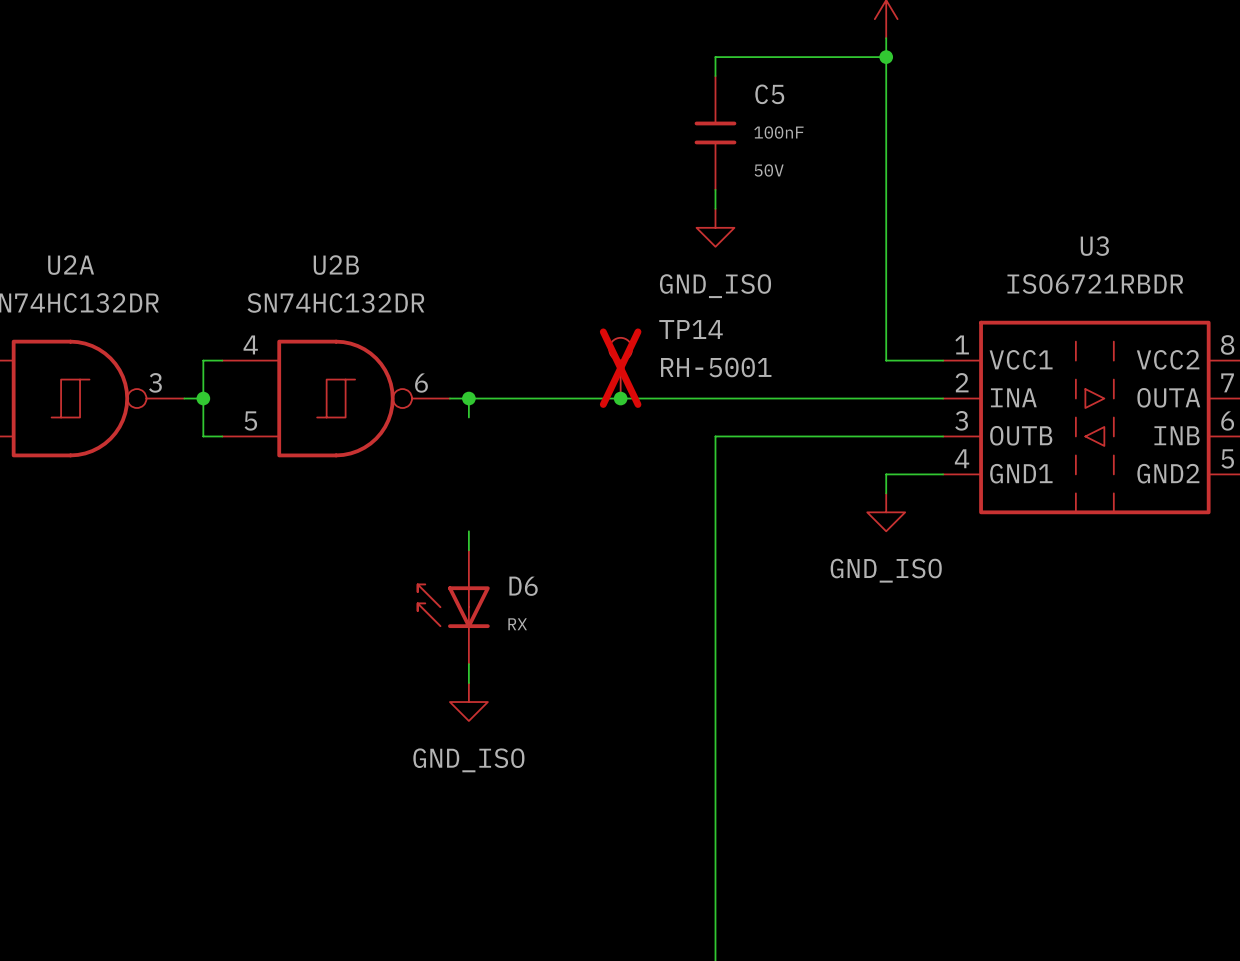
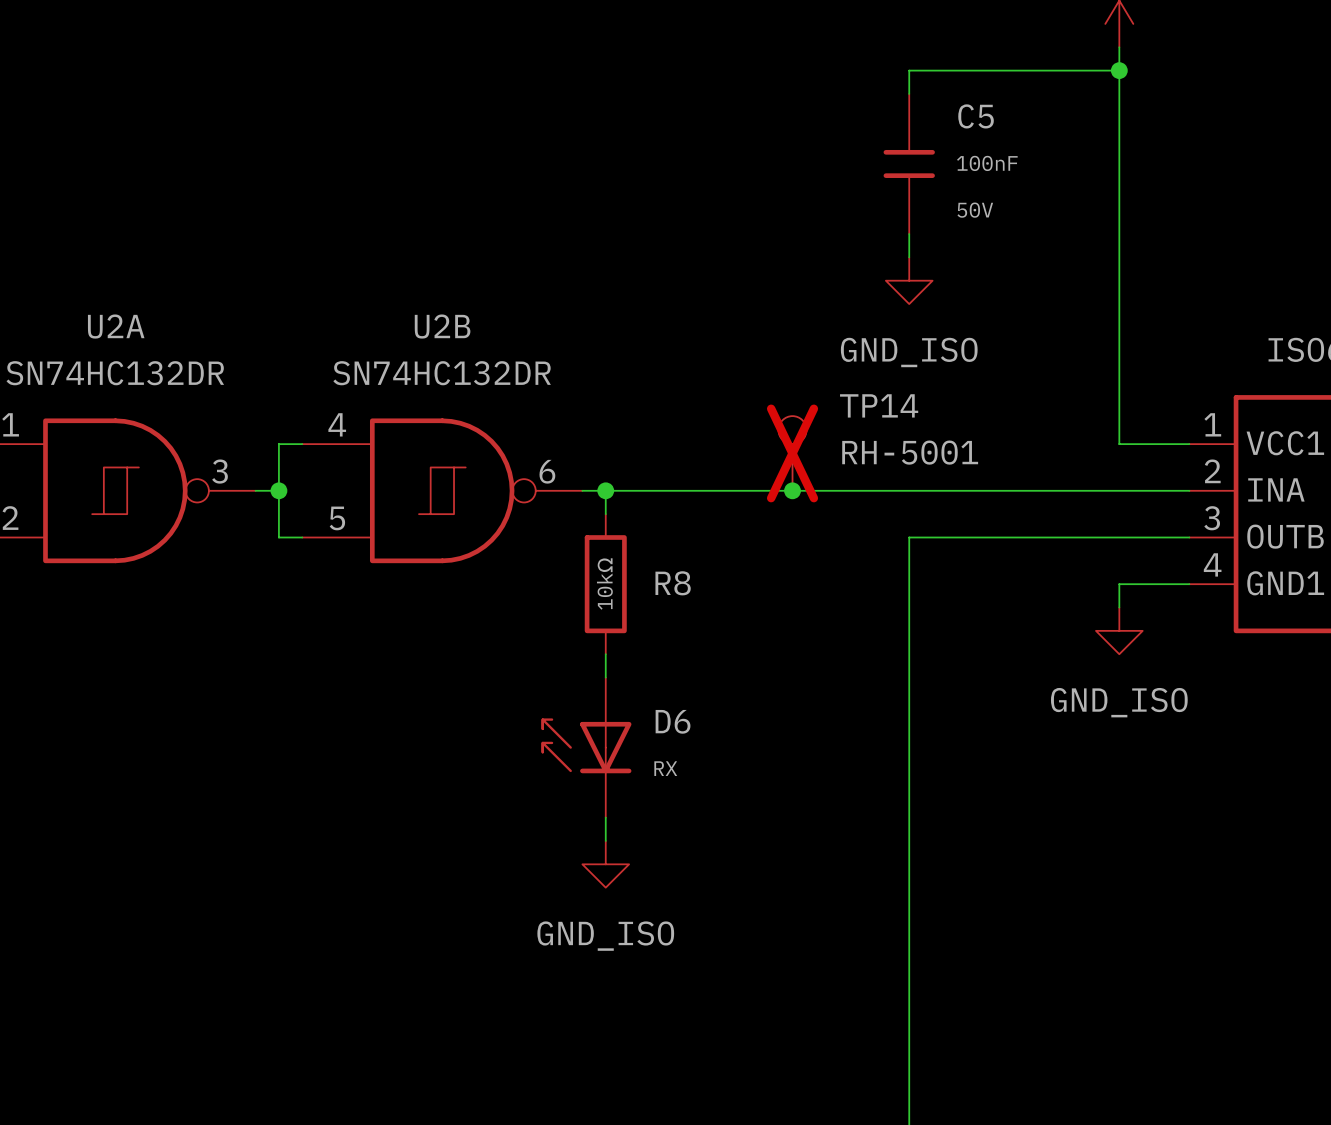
R8: none -> 10kΩ (605, 584)

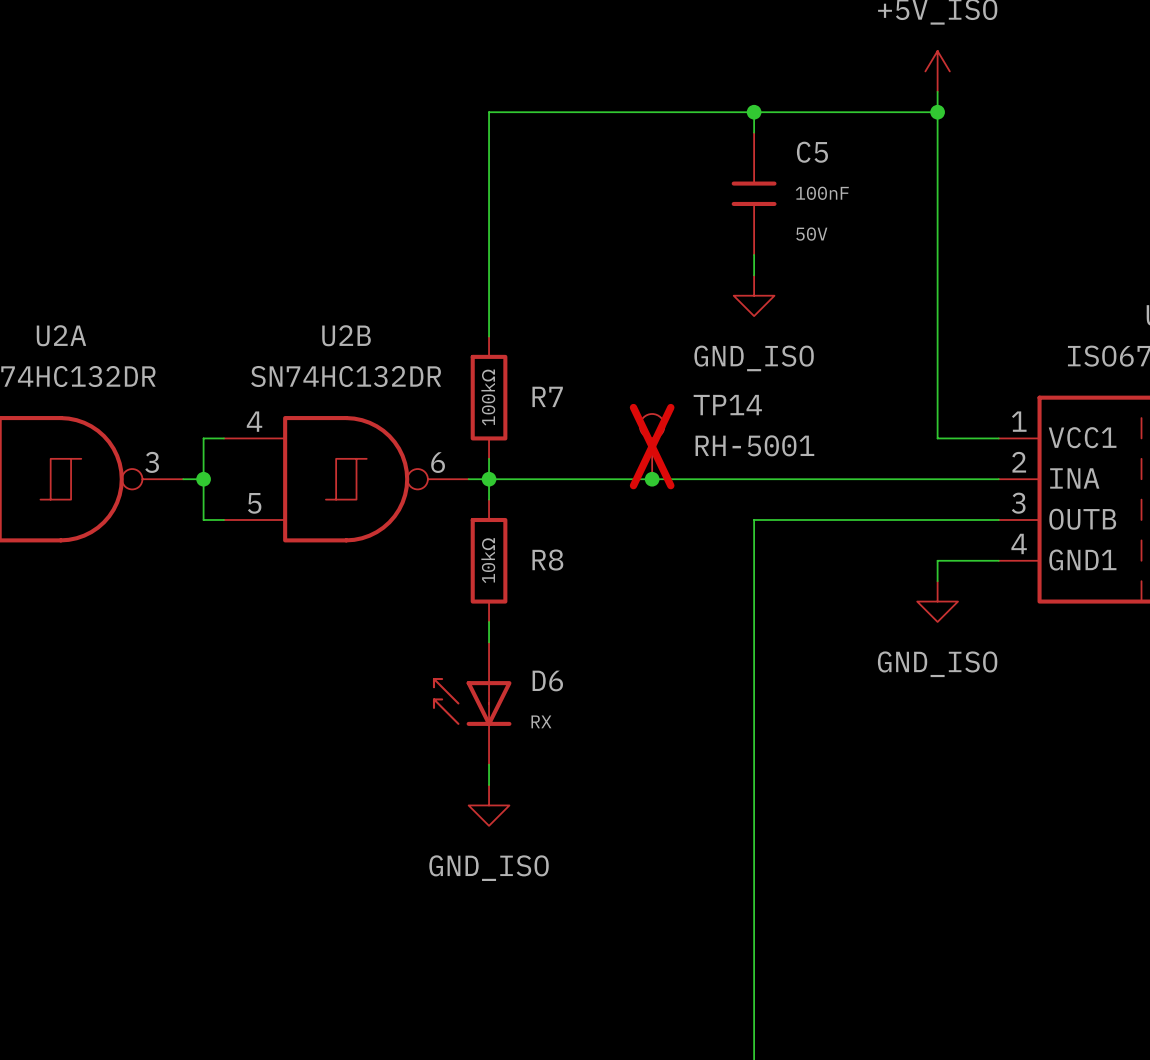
wire: none -> (754, 112) (489, 112) (489, 336)
junction: none -> (754, 112)
R7: none -> 100kΩ (489, 397)
wire: none -> (489, 458) (489, 479)

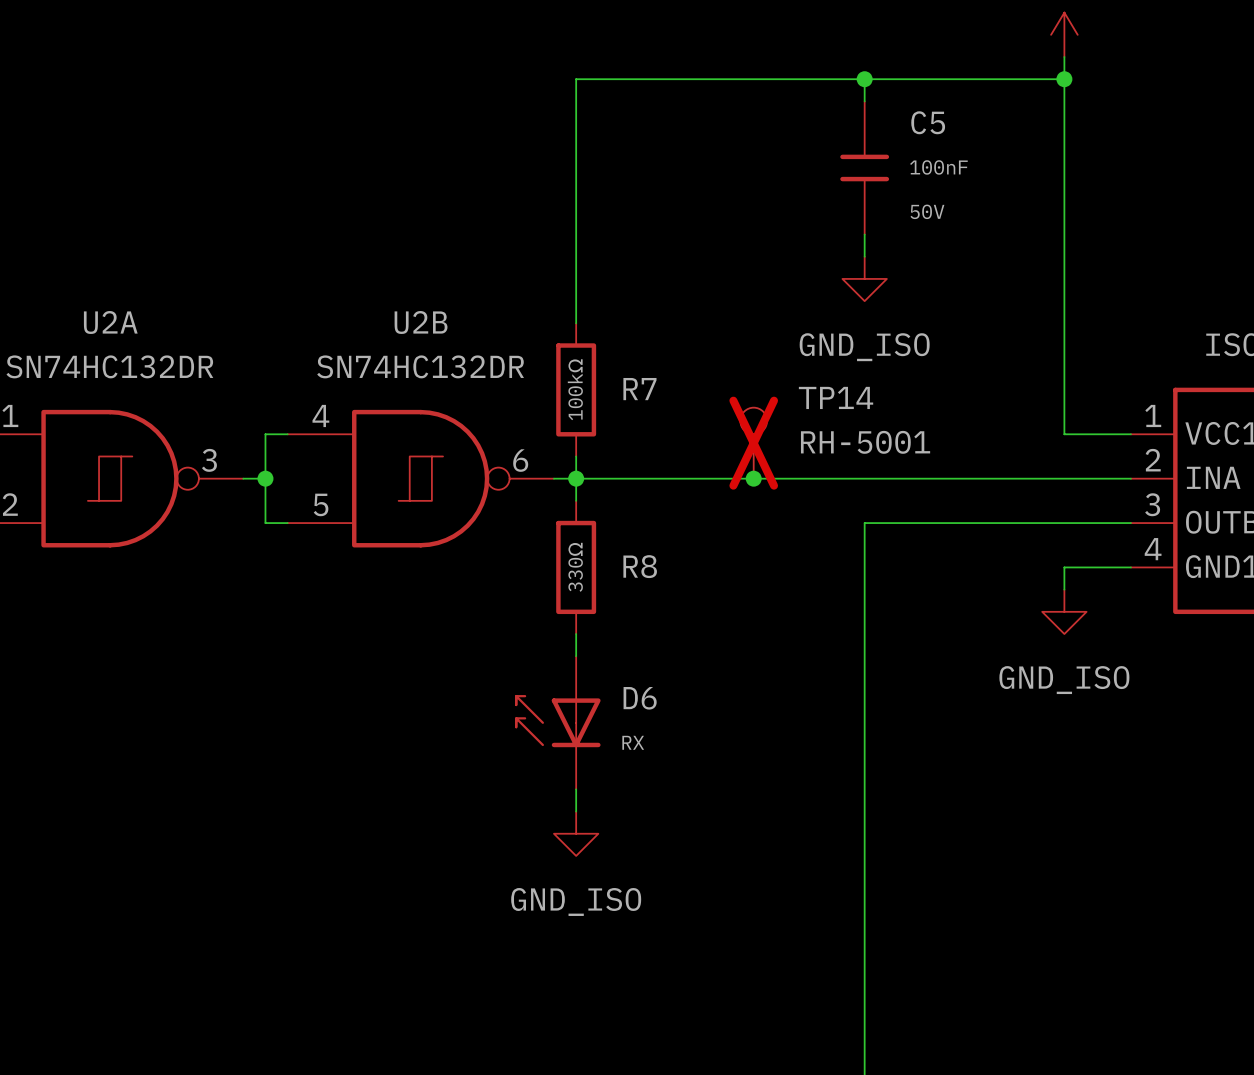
R8 value: 10kΩ (488, 560) -> 330Ω (575, 567)

